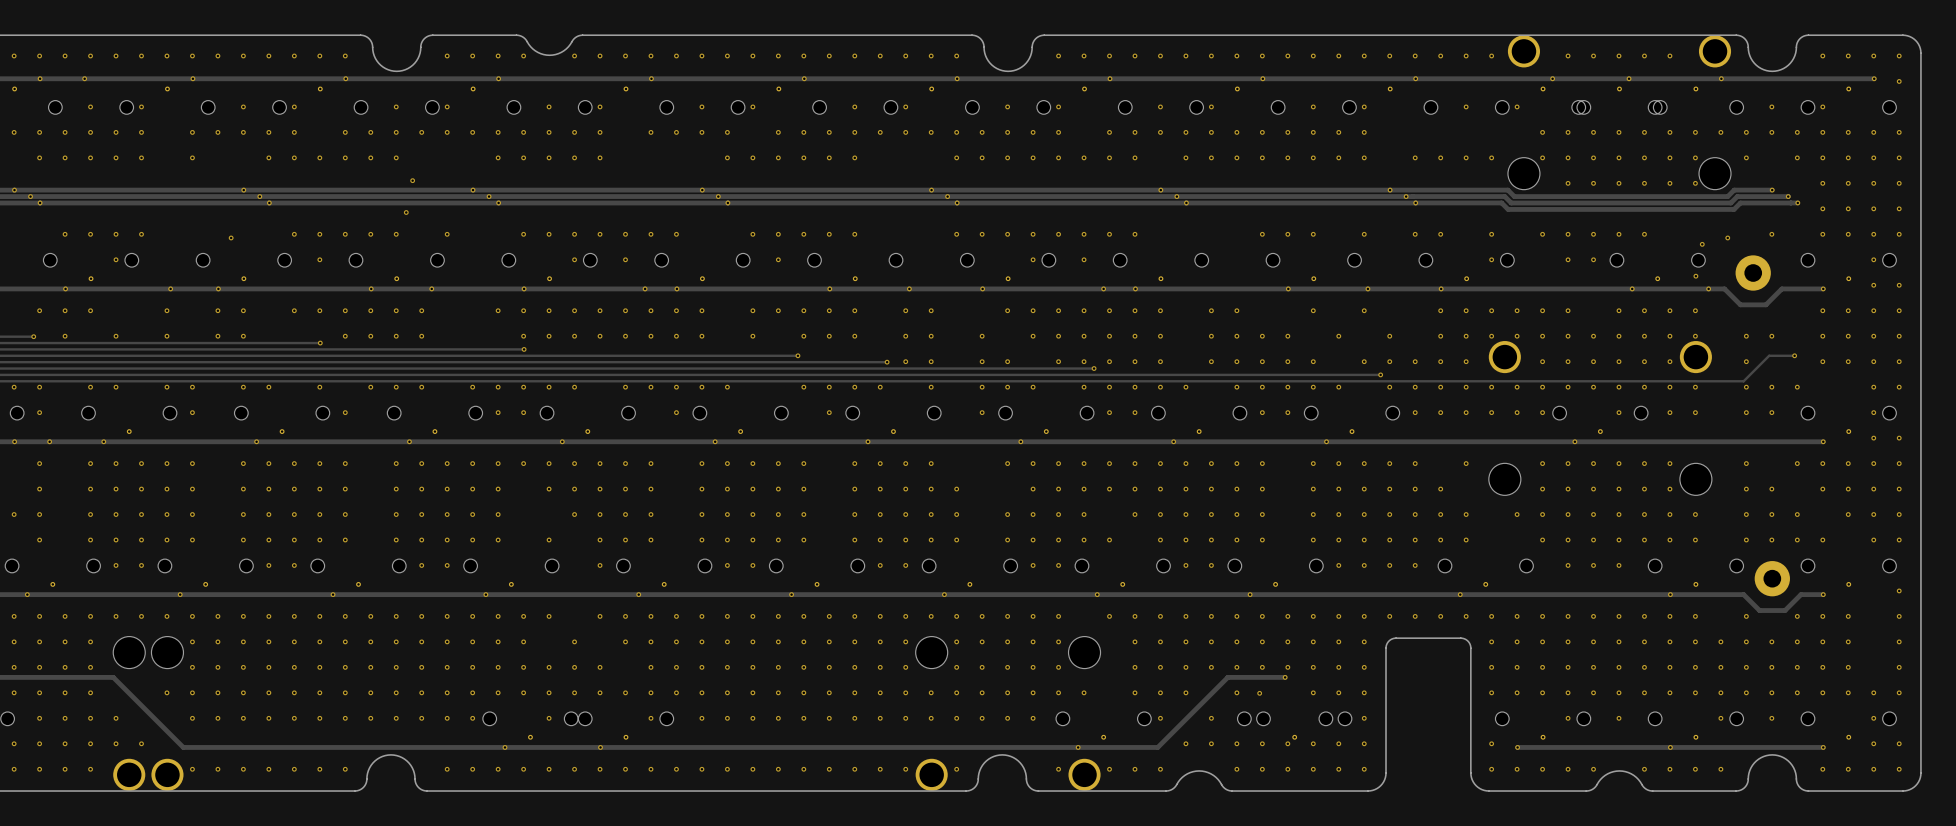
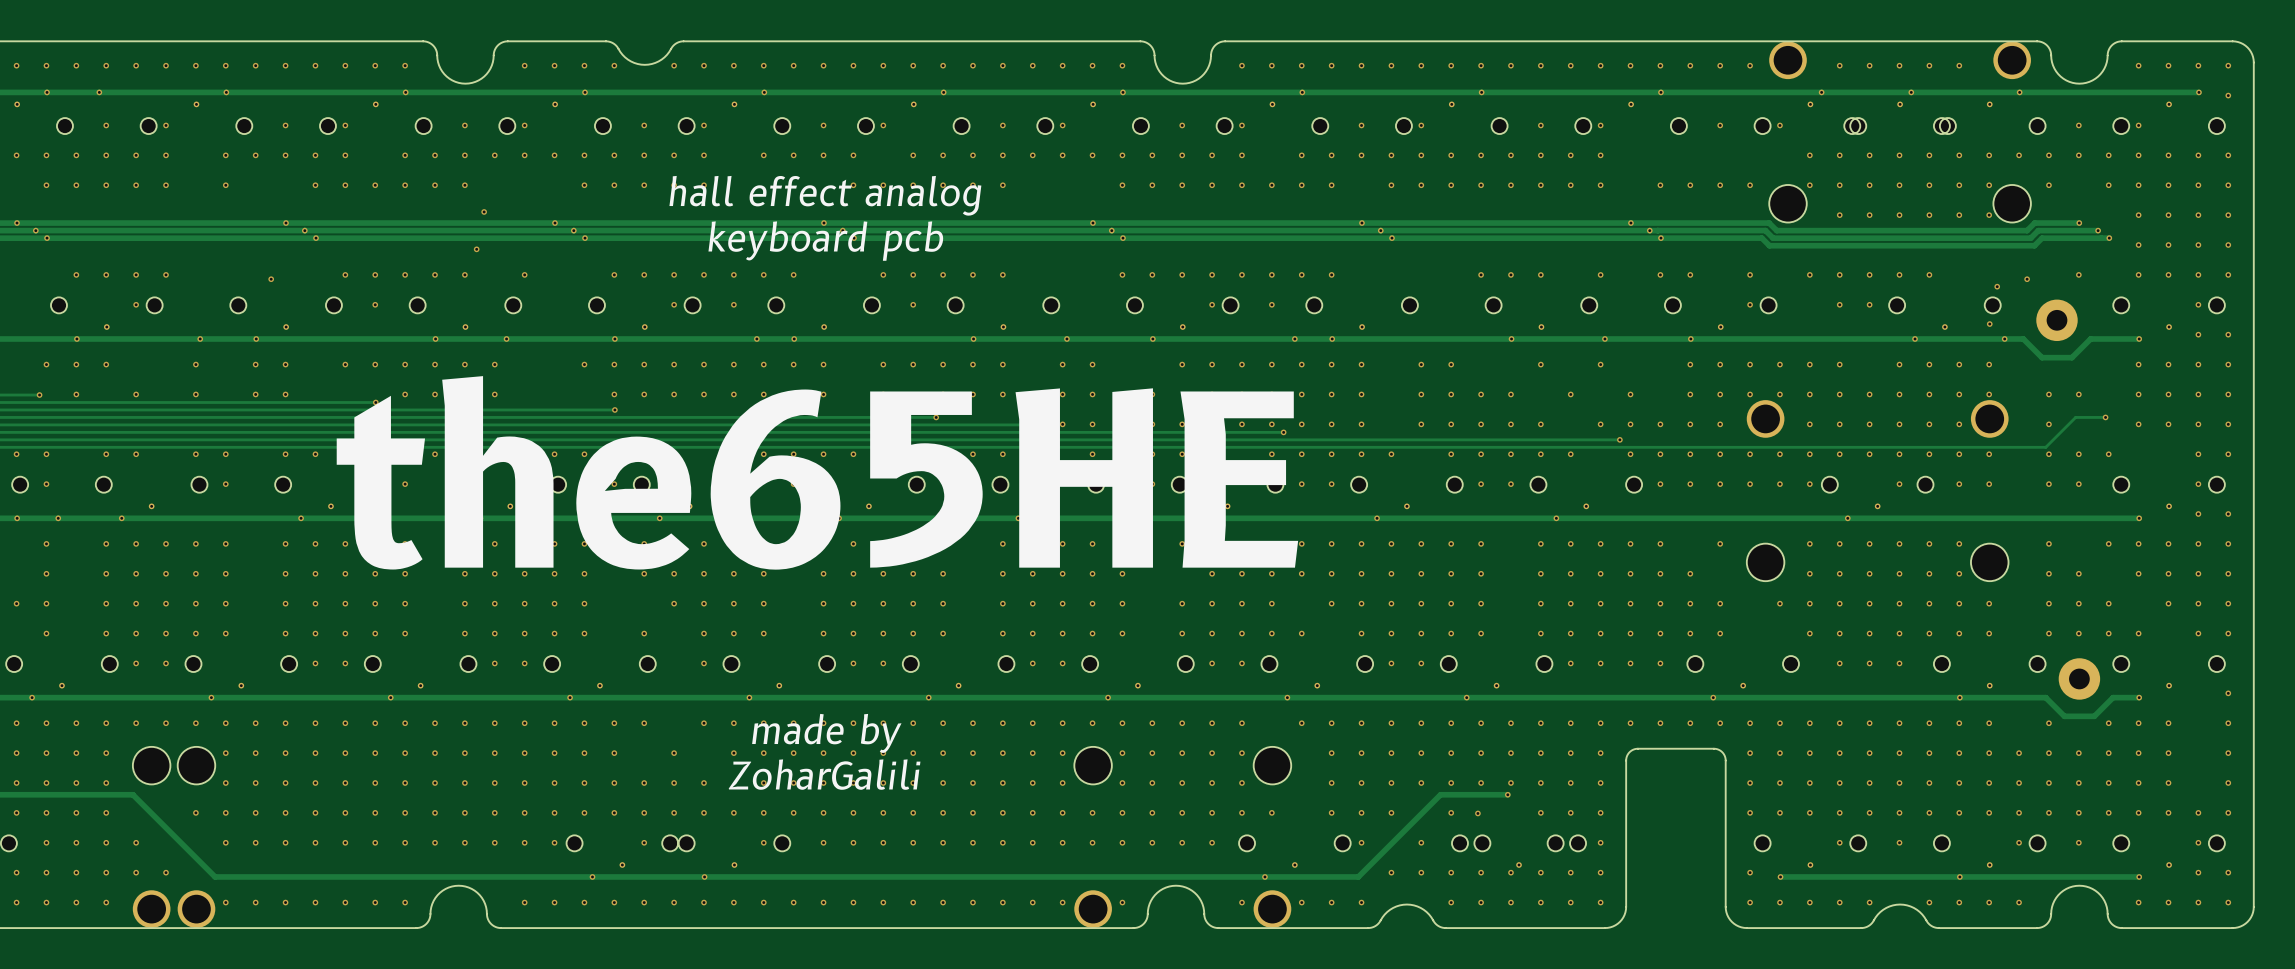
text: none -> hall effect analog (825, 195)
text: none -> keyboard pcb (825, 241)
text: none -> the65HE (817, 472)
text: none -> made by (826, 733)
text: none -> ZoharGalili (824, 774)

